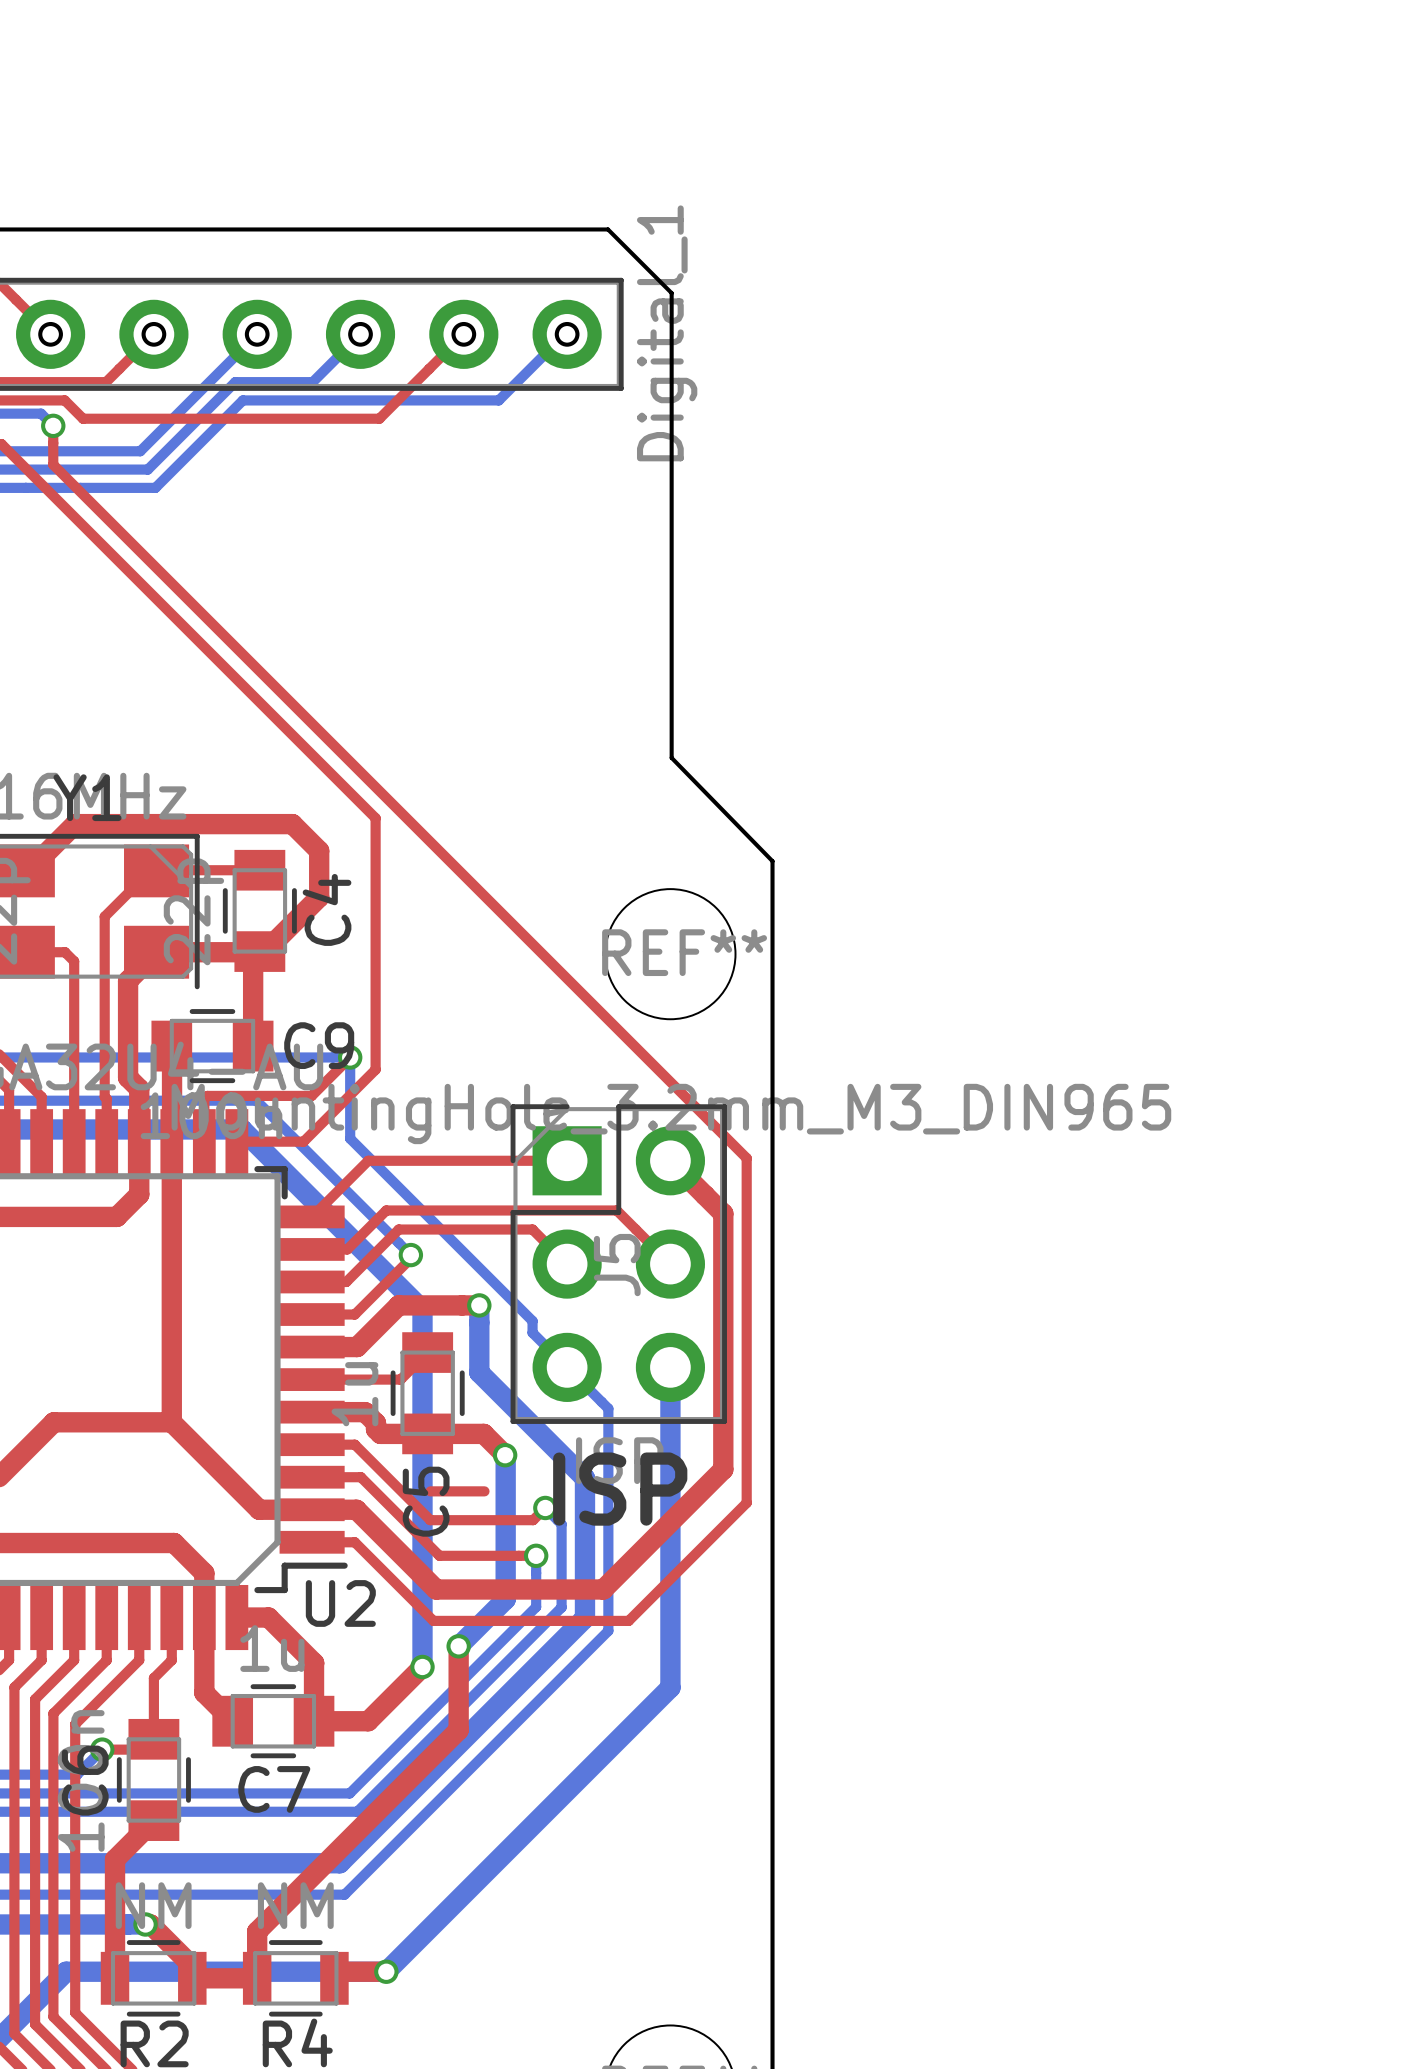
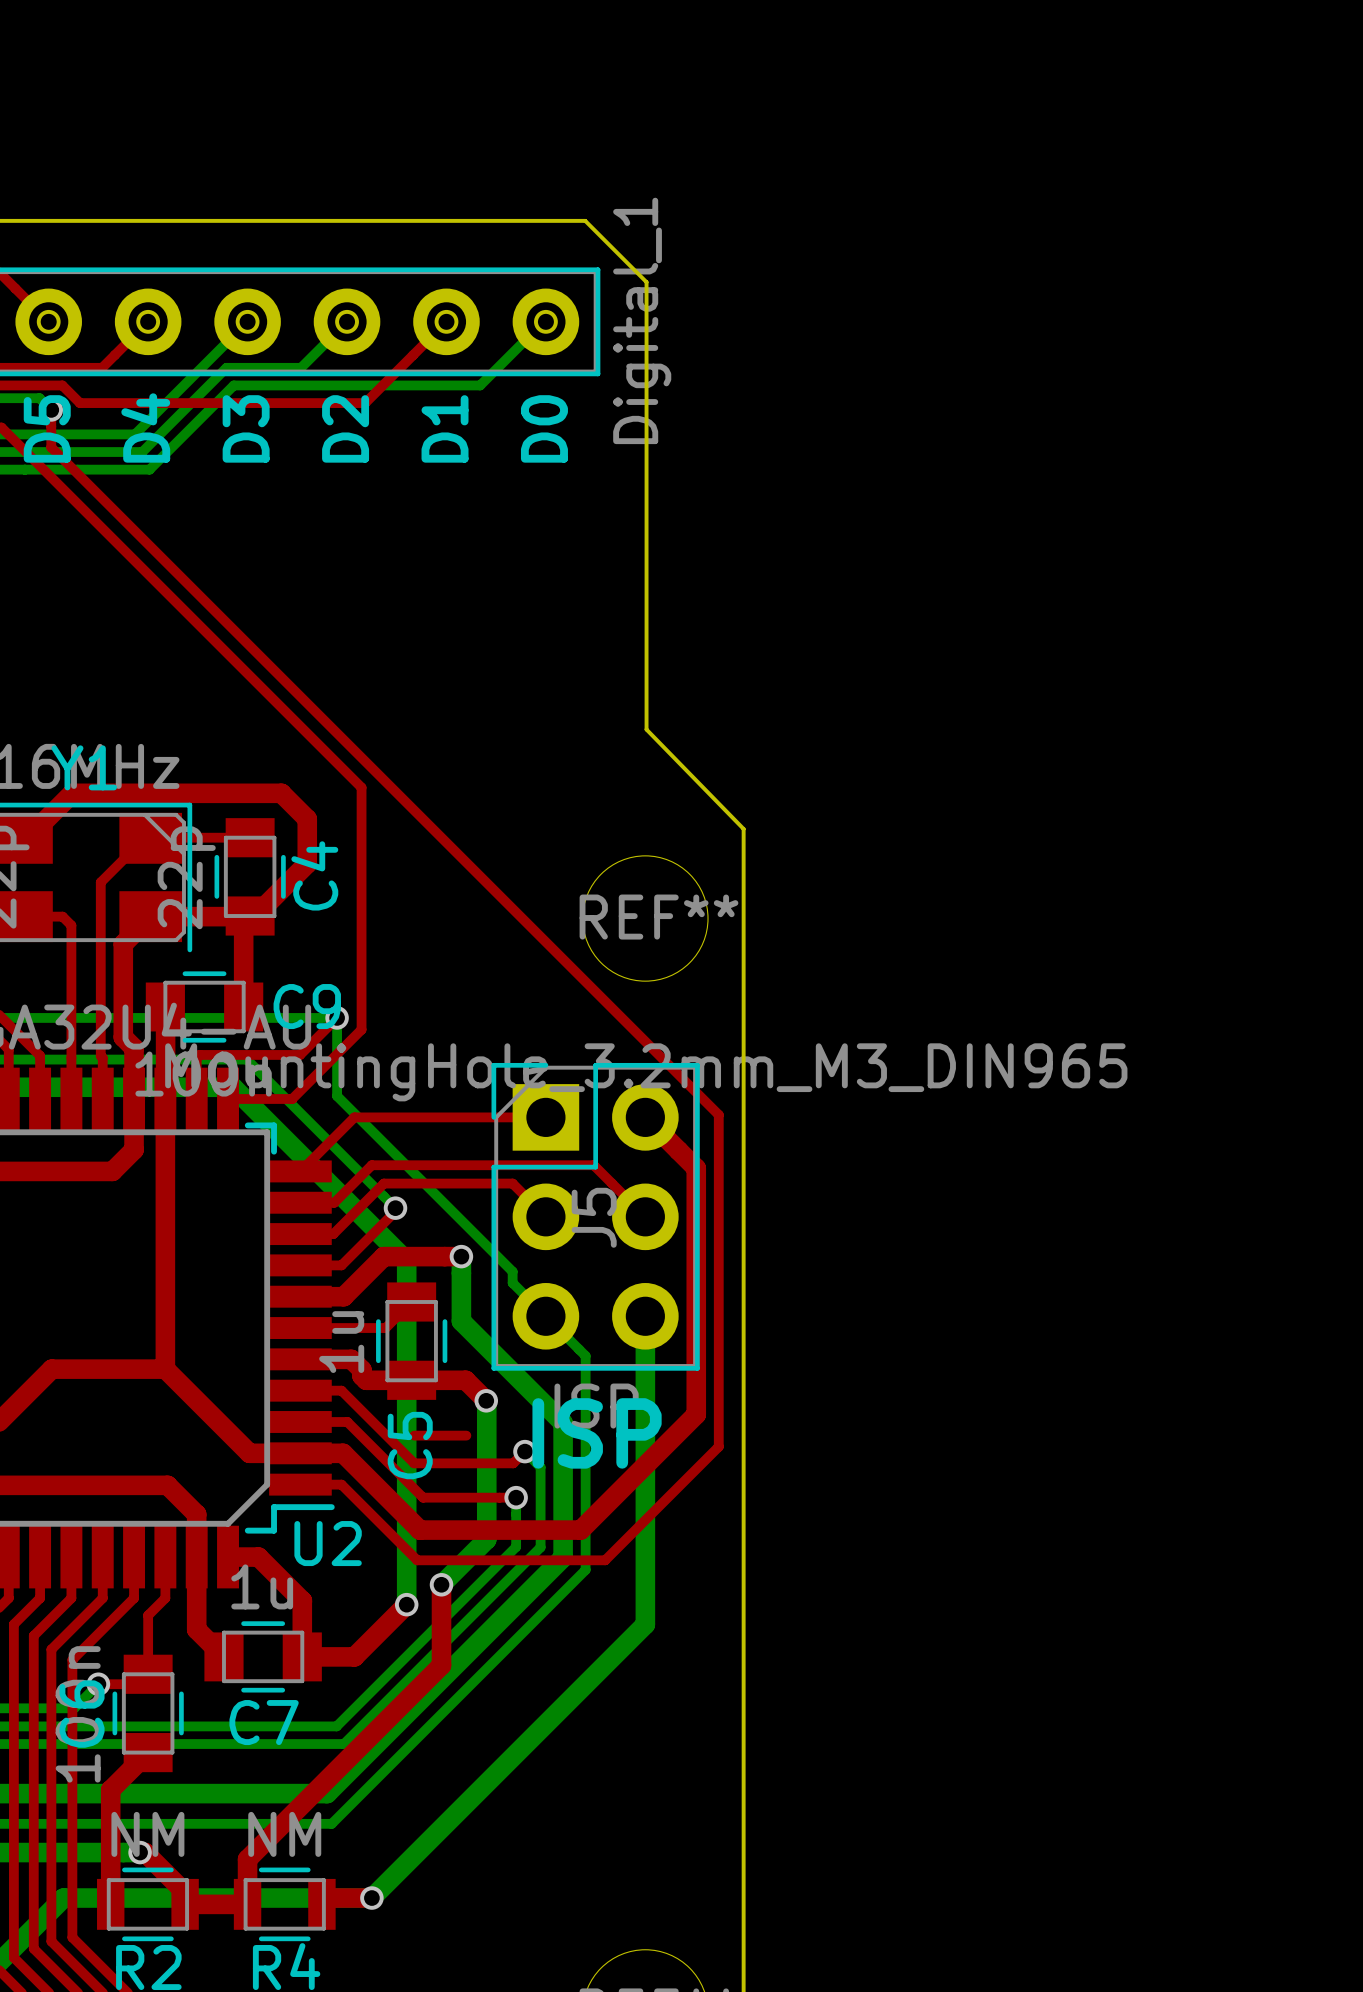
text: none -> D4 (145, 427)
text: none -> D5 (47, 428)
text: none -> D3 (246, 428)
text: none -> D2 (345, 428)
text: none -> D1 (445, 428)
text: none -> D0 (544, 428)

